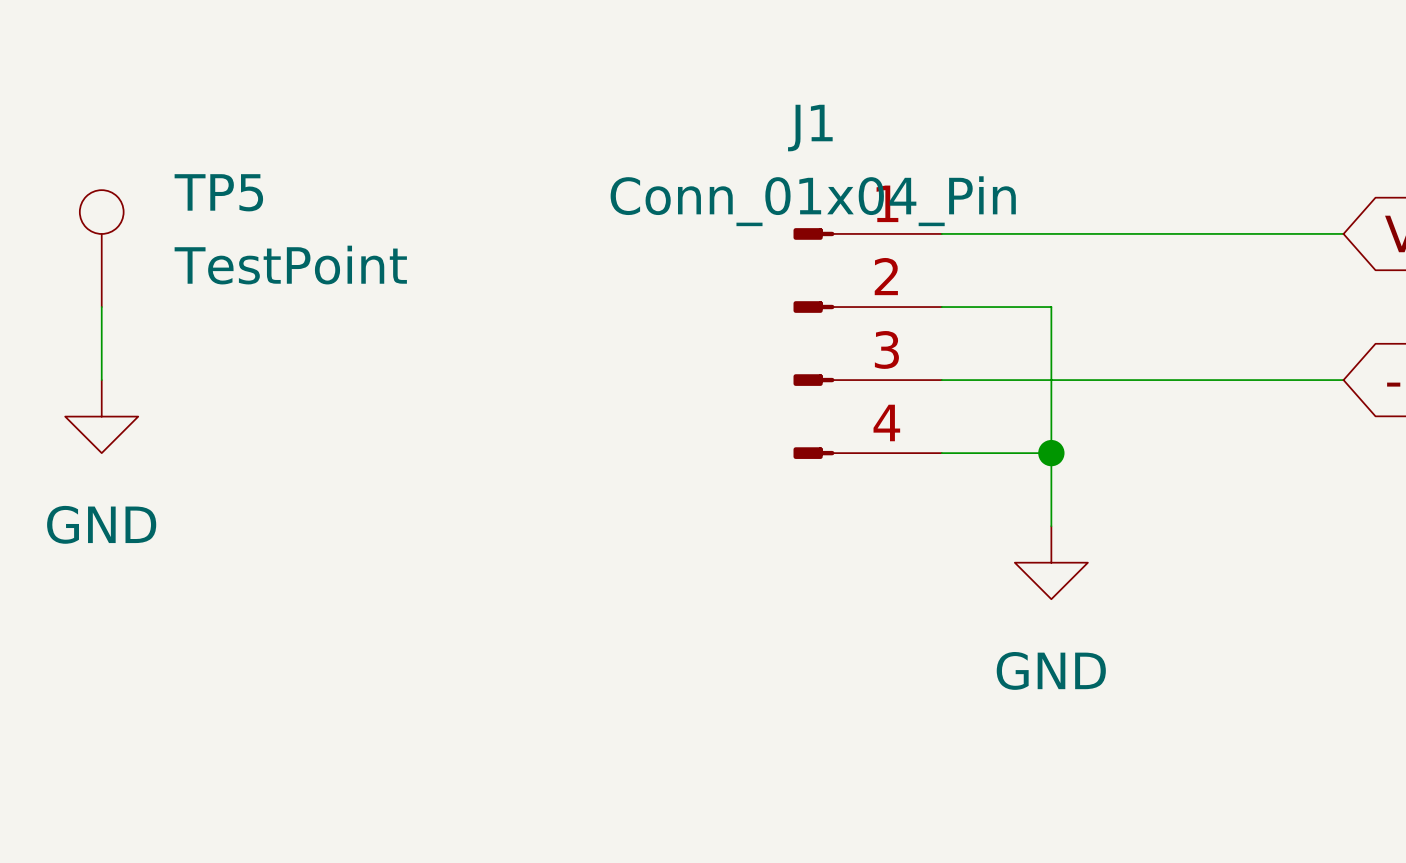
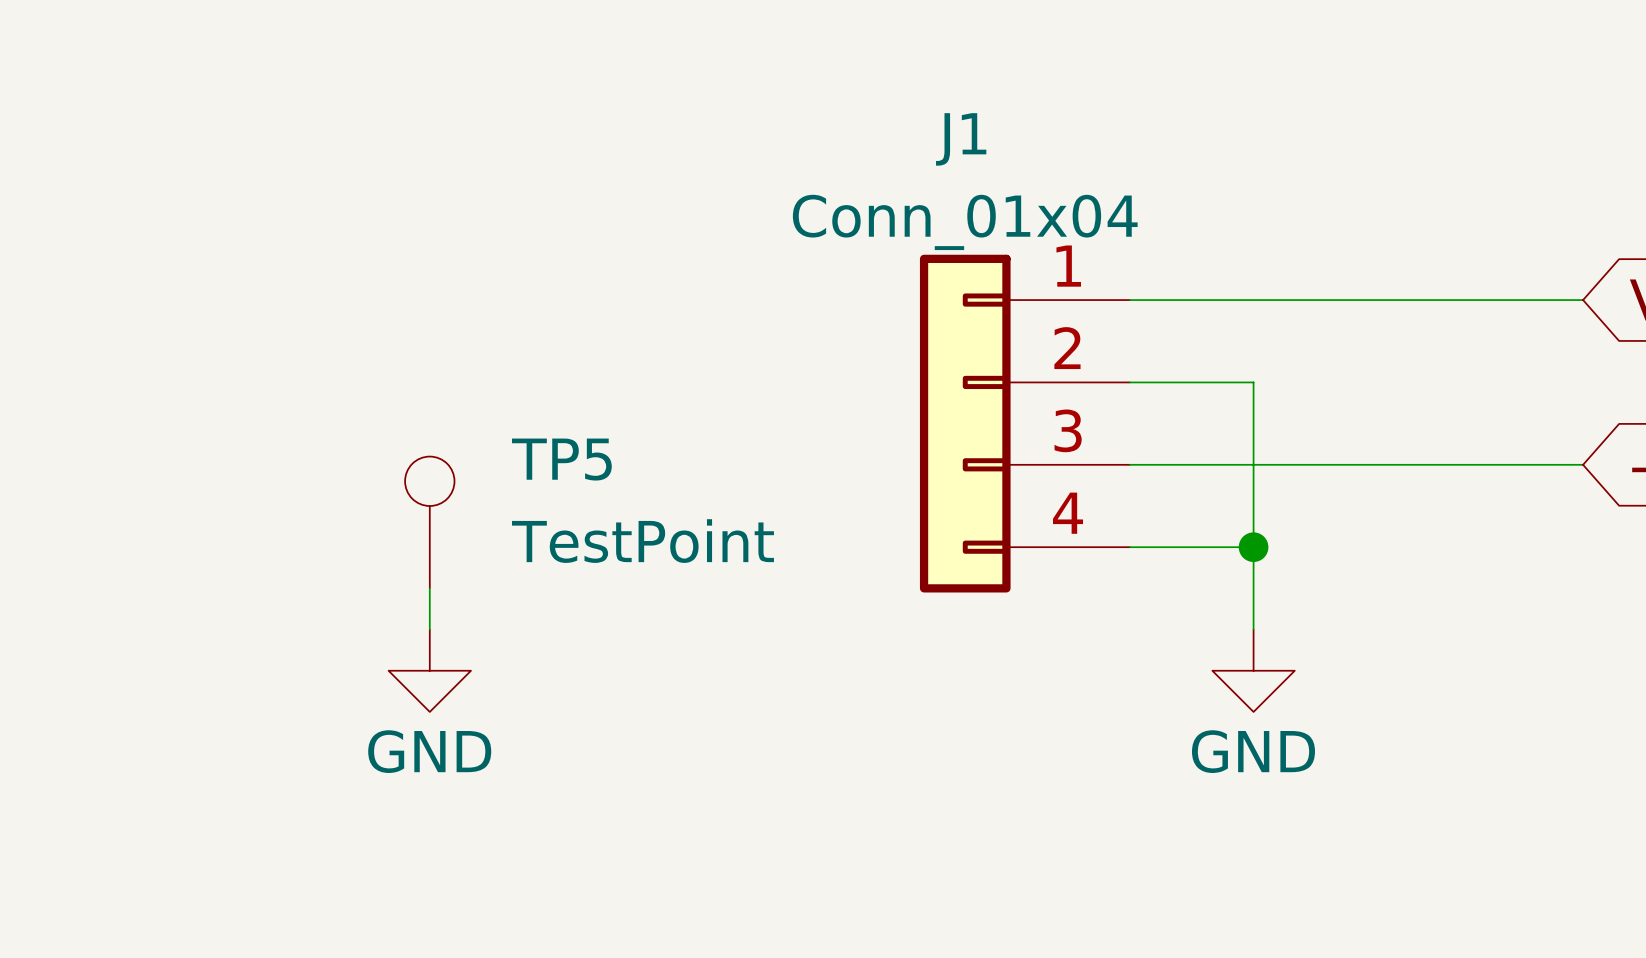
J1 value: Conn_01x04_Pin (813, 201) -> Conn_01x04 (965, 222)
J1 symbol: [793, 228, 942, 459] -> [919, 254, 1131, 593]
TP5 position: (101, 248) -> (429, 522)
wire: (101, 307) (101, 380) -> none
power symbol position: GND (101, 416) -> GND (429, 670)
wire: none -> (429, 588) (429, 629)
power symbol text position: GND (101, 524) -> GND (429, 751)
power symbol text position: GND (1051, 670) -> GND (1253, 751)

